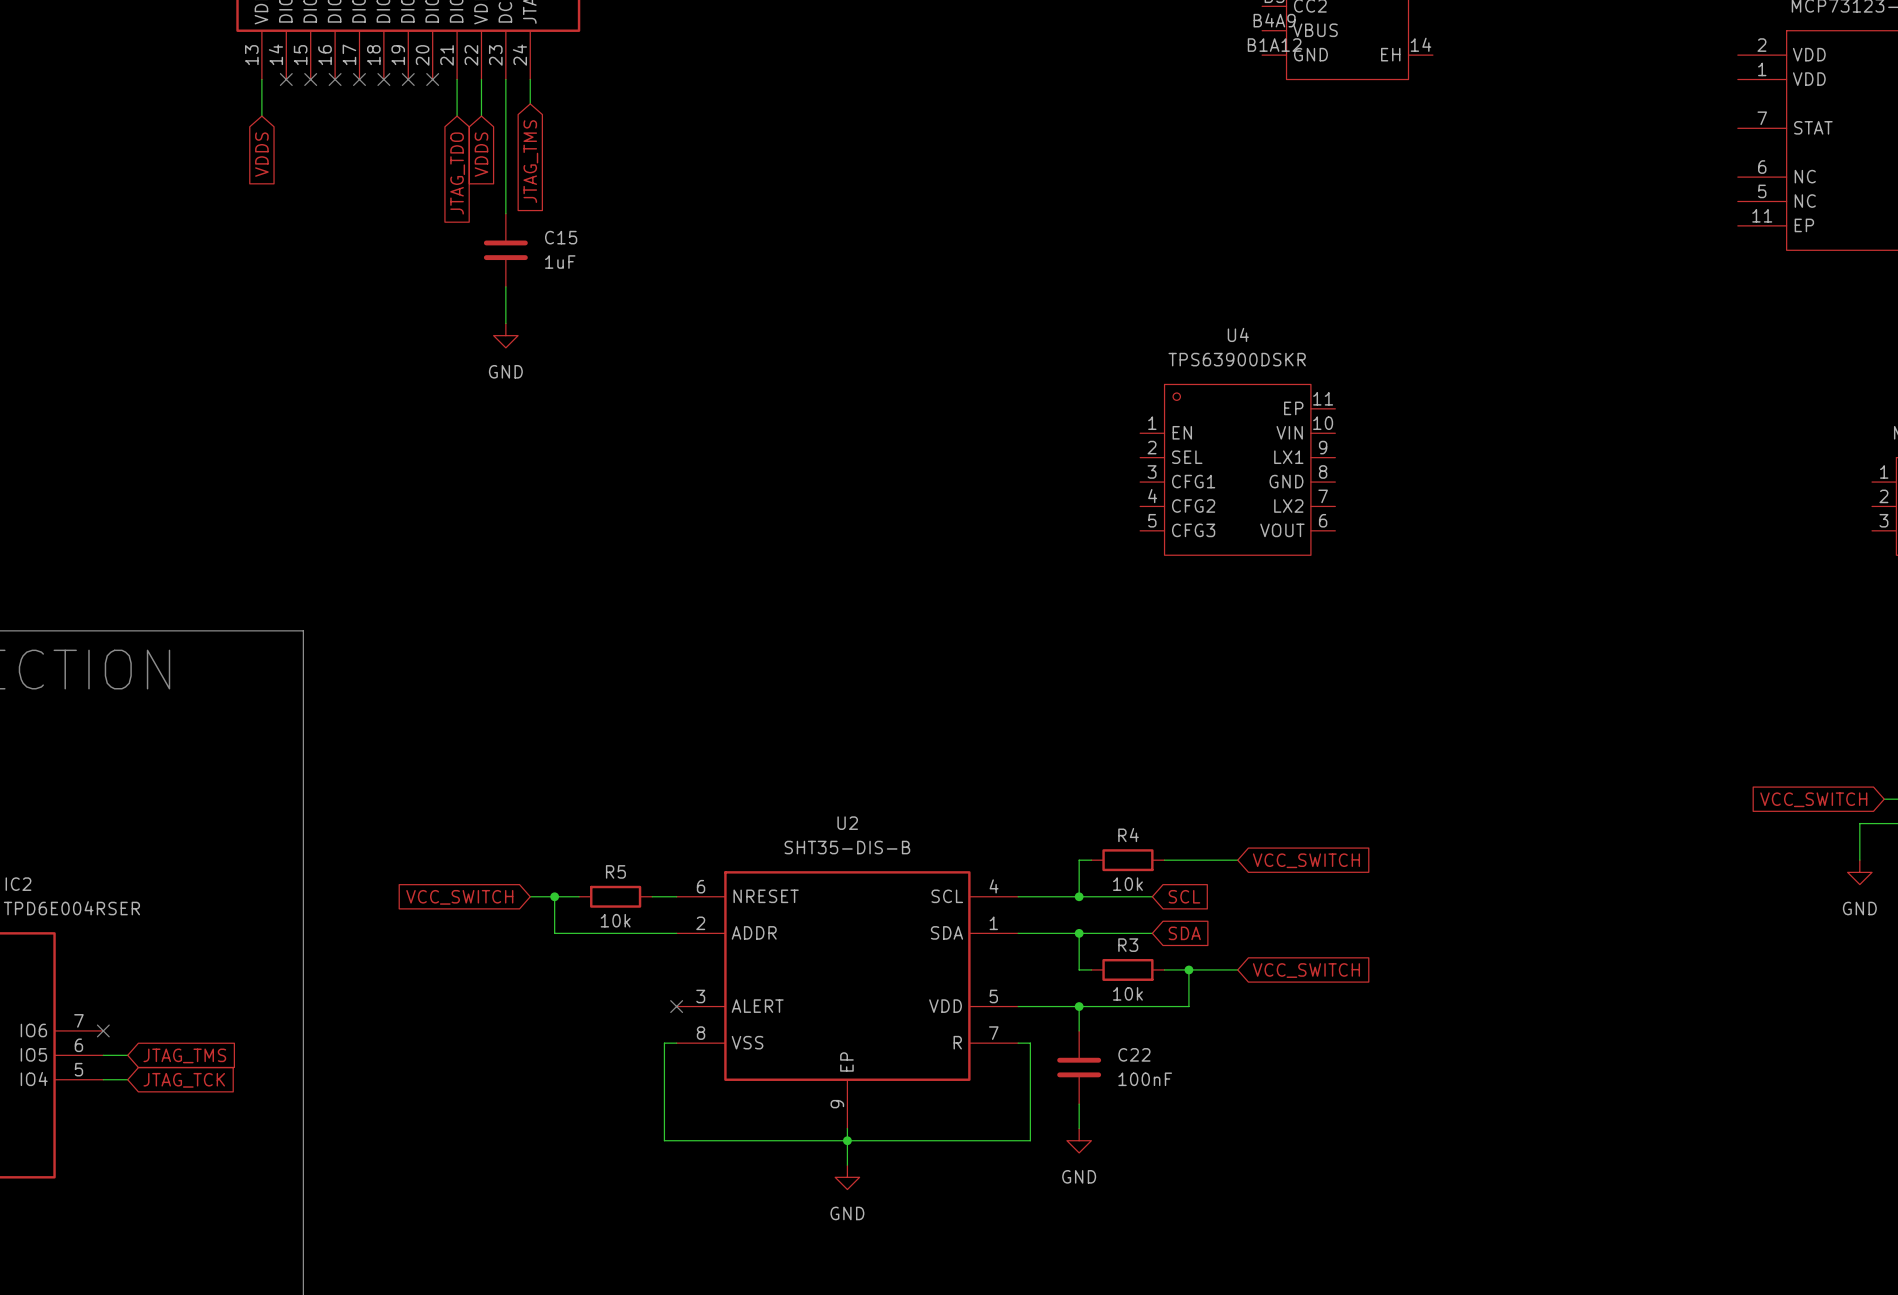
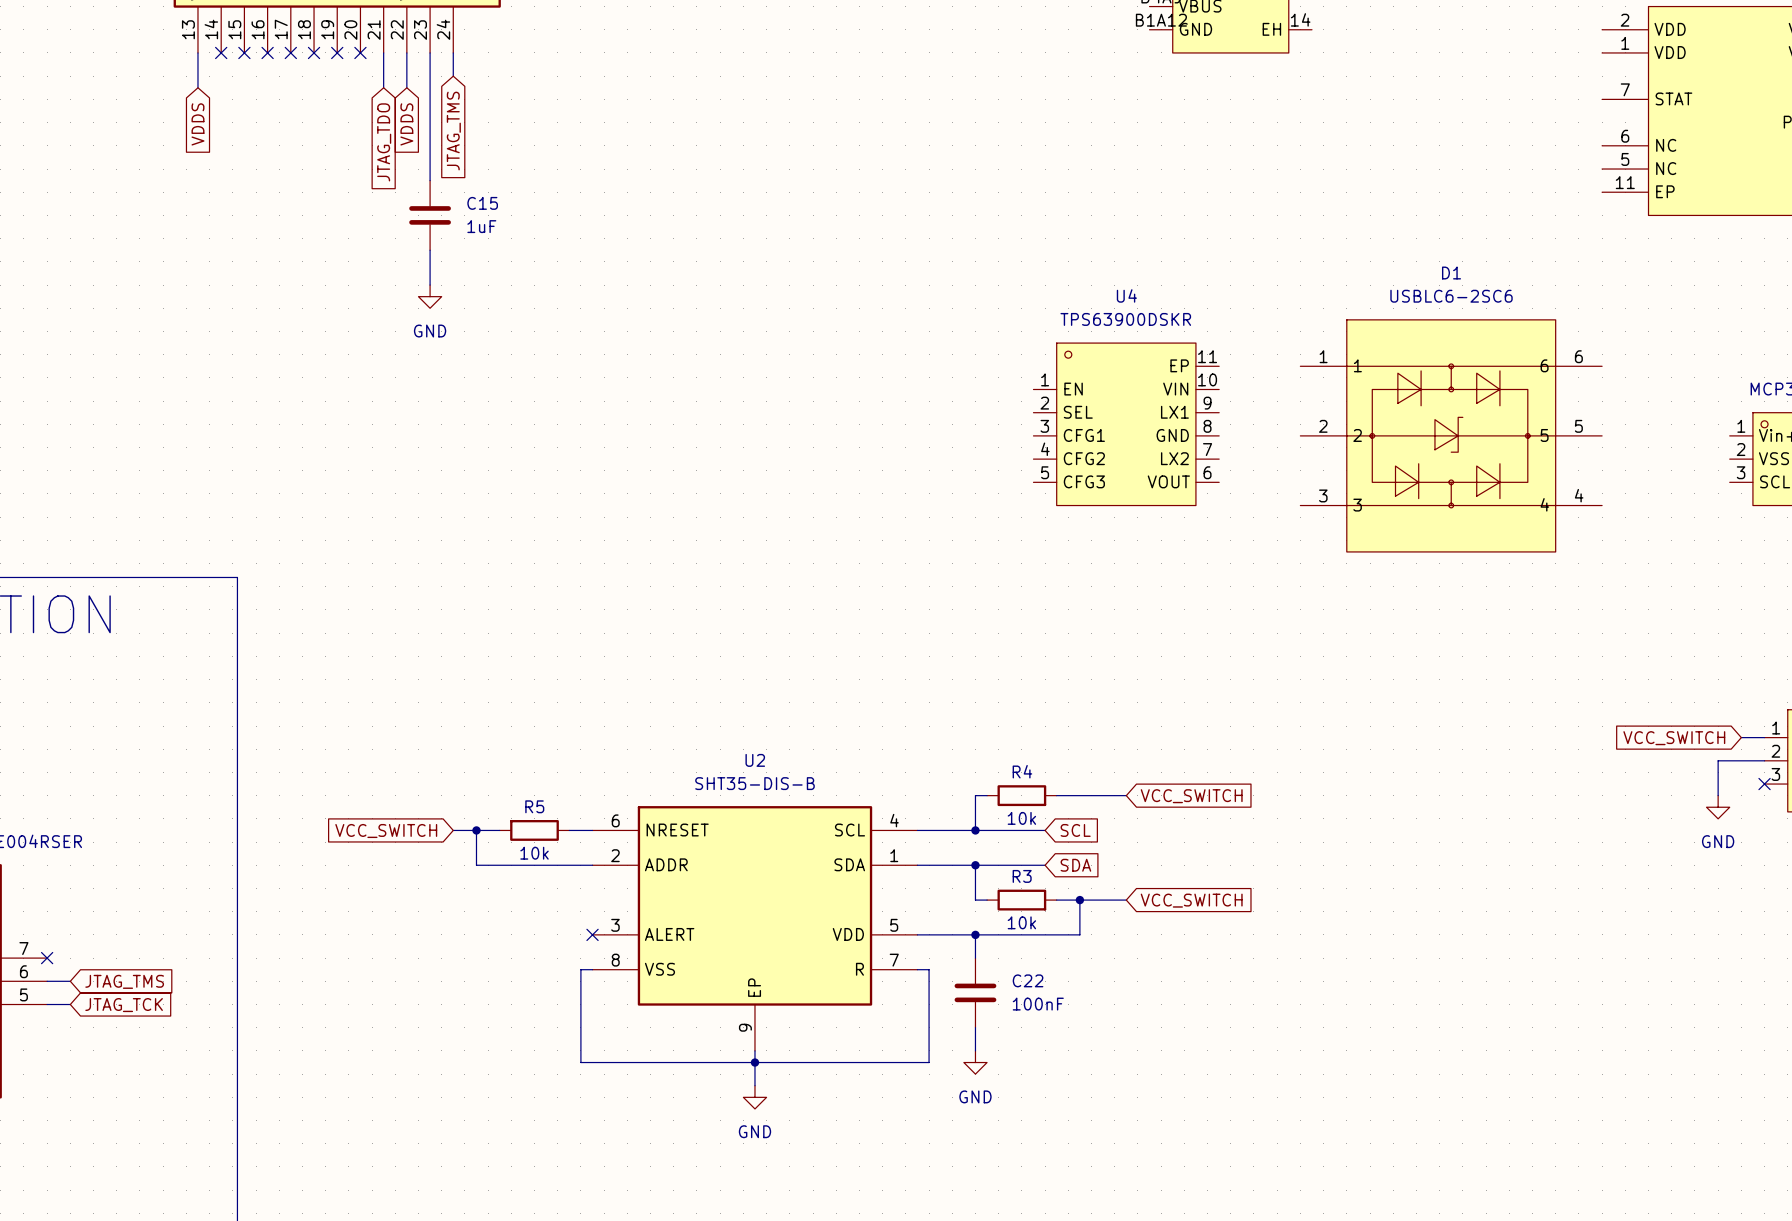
D1: none -> USBLC6-2SC6 (1451, 435)

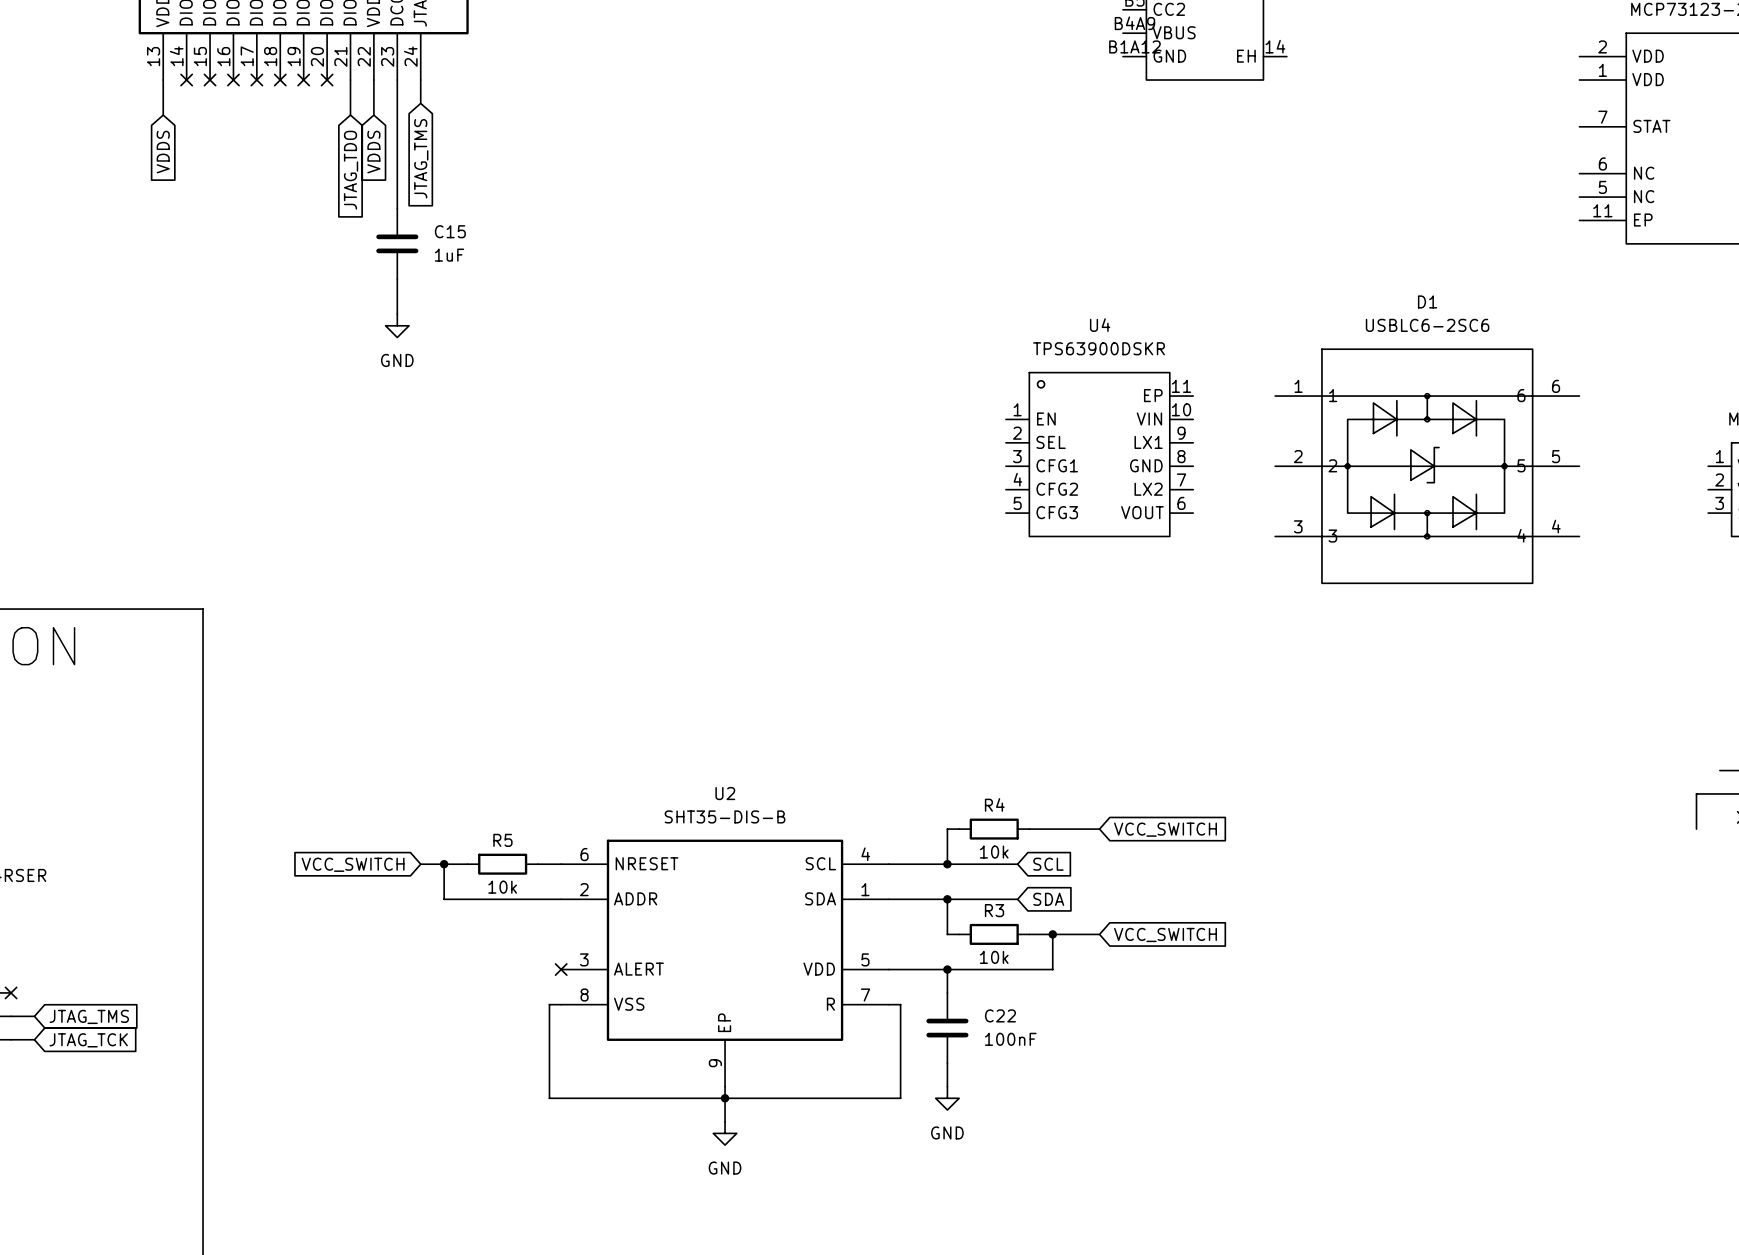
global label: VCC_SWITCH (1674, 738) -> none
power symbol: GND (1718, 807) -> none

